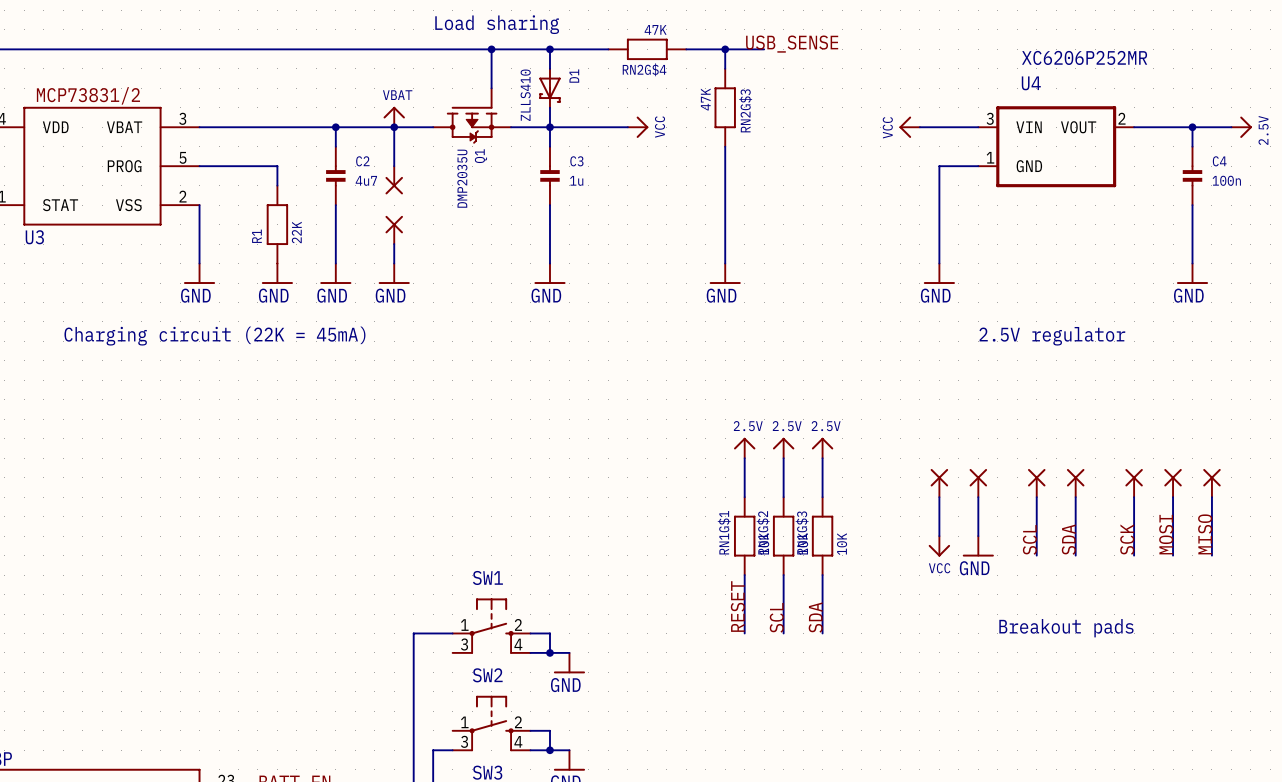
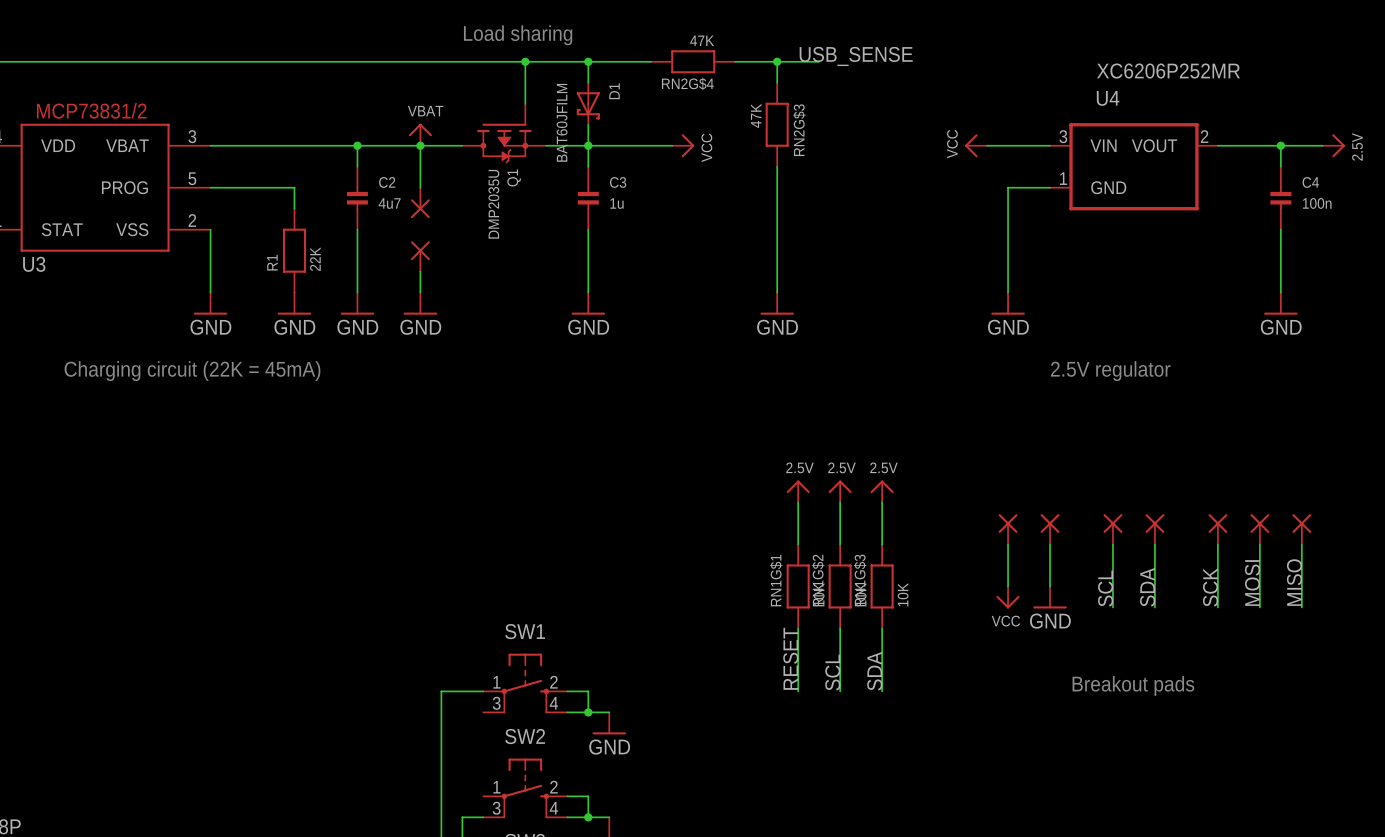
D1 value: ZLLS410 (525, 95) -> BAT60JFILM (562, 122)

